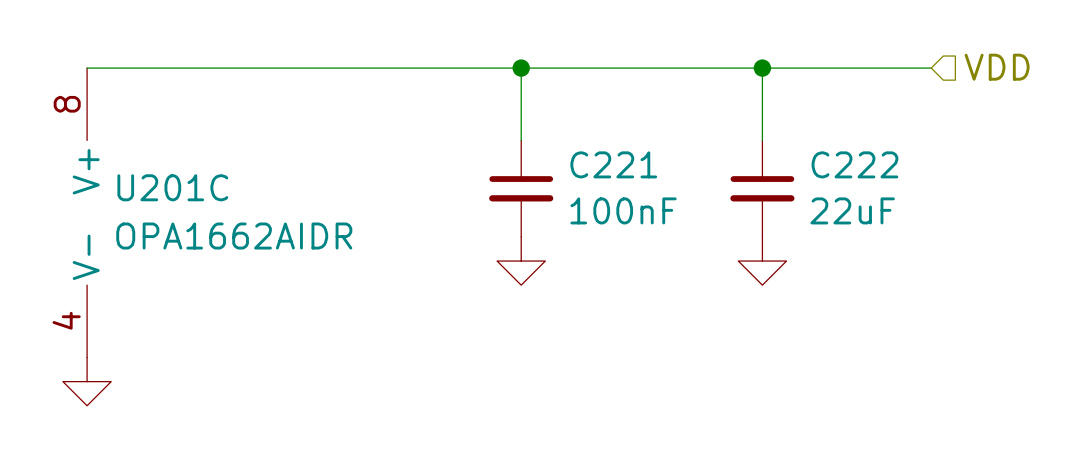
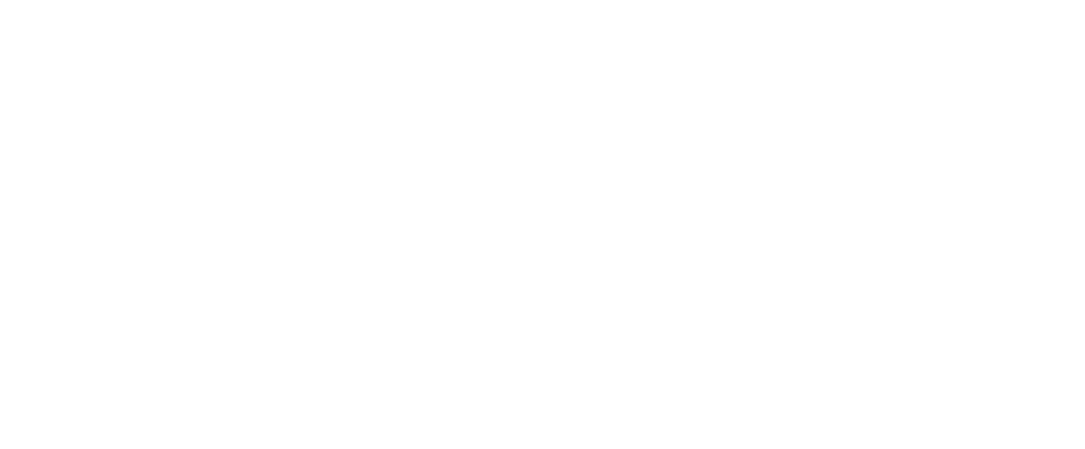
hierarchical label: VDD (997, 67) -> none
wire: (87, 68) (931, 68) -> none
wire: (521, 68) (521, 140) -> none
junction: (521, 68) -> none
wire: (762, 68) (762, 140) -> none
junction: (762, 68) -> none
C221: 100nF (521, 188) -> none
C222: 22uF (762, 188) -> none
U201C: OPA1662AIDR (87, 212) -> none
power symbol: (521, 261) -> none
power symbol: (762, 261) -> none
power symbol: (87, 381) -> none

